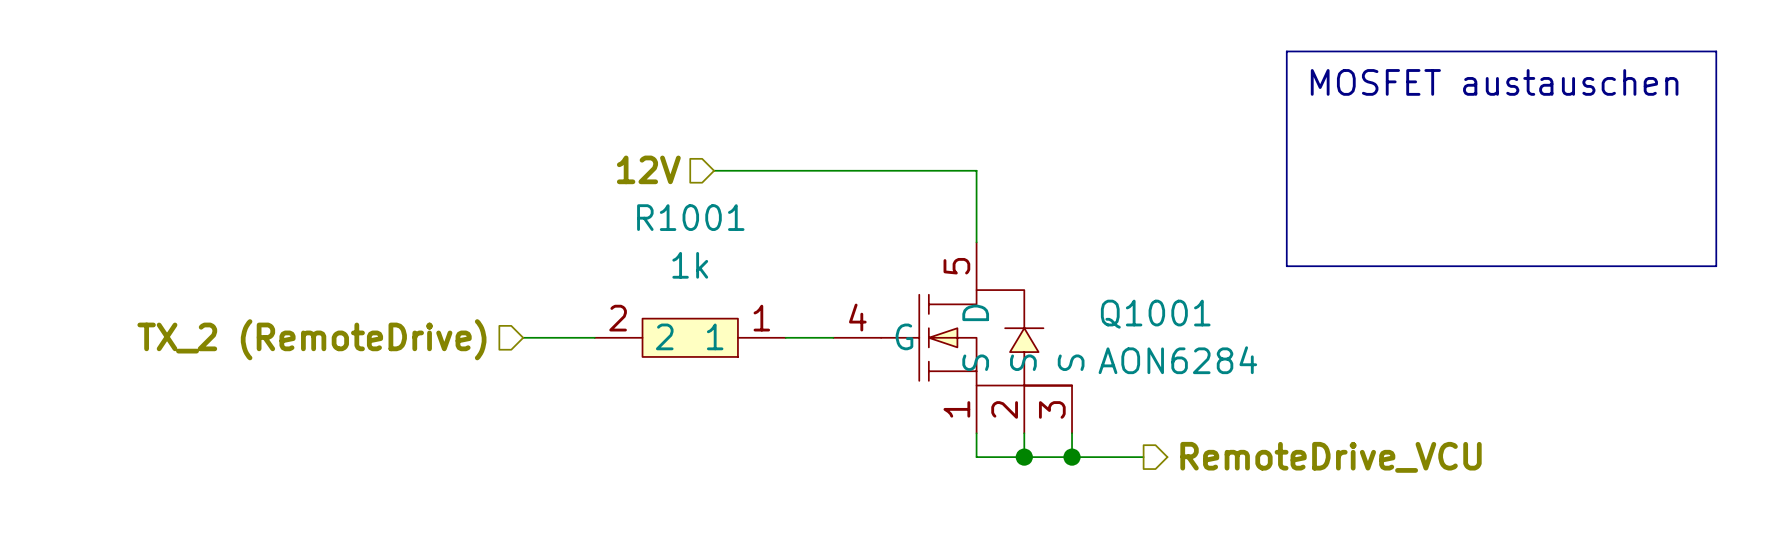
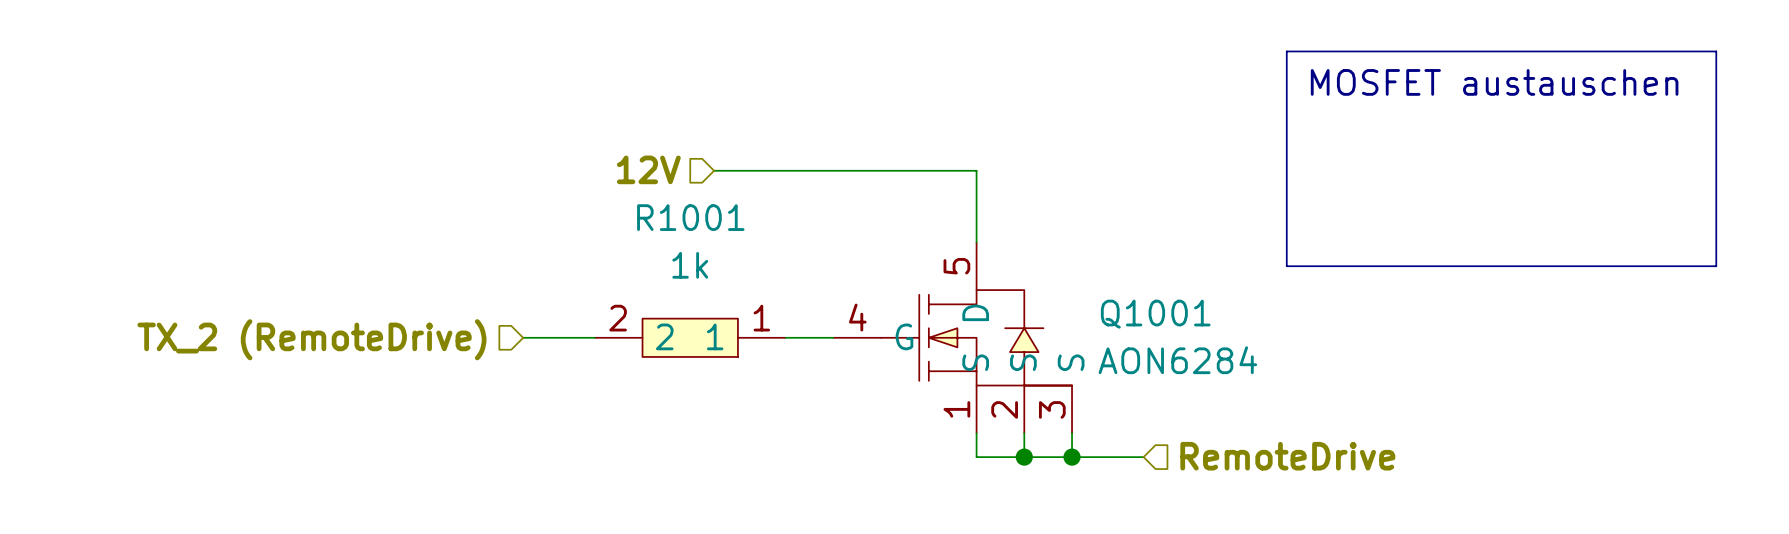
hierarchical label shape: output (1331, 457) -> input (1287, 456)
hierarchical label: RemoteDrive_VCU (1331, 457) -> RemoteDrive (1287, 456)

